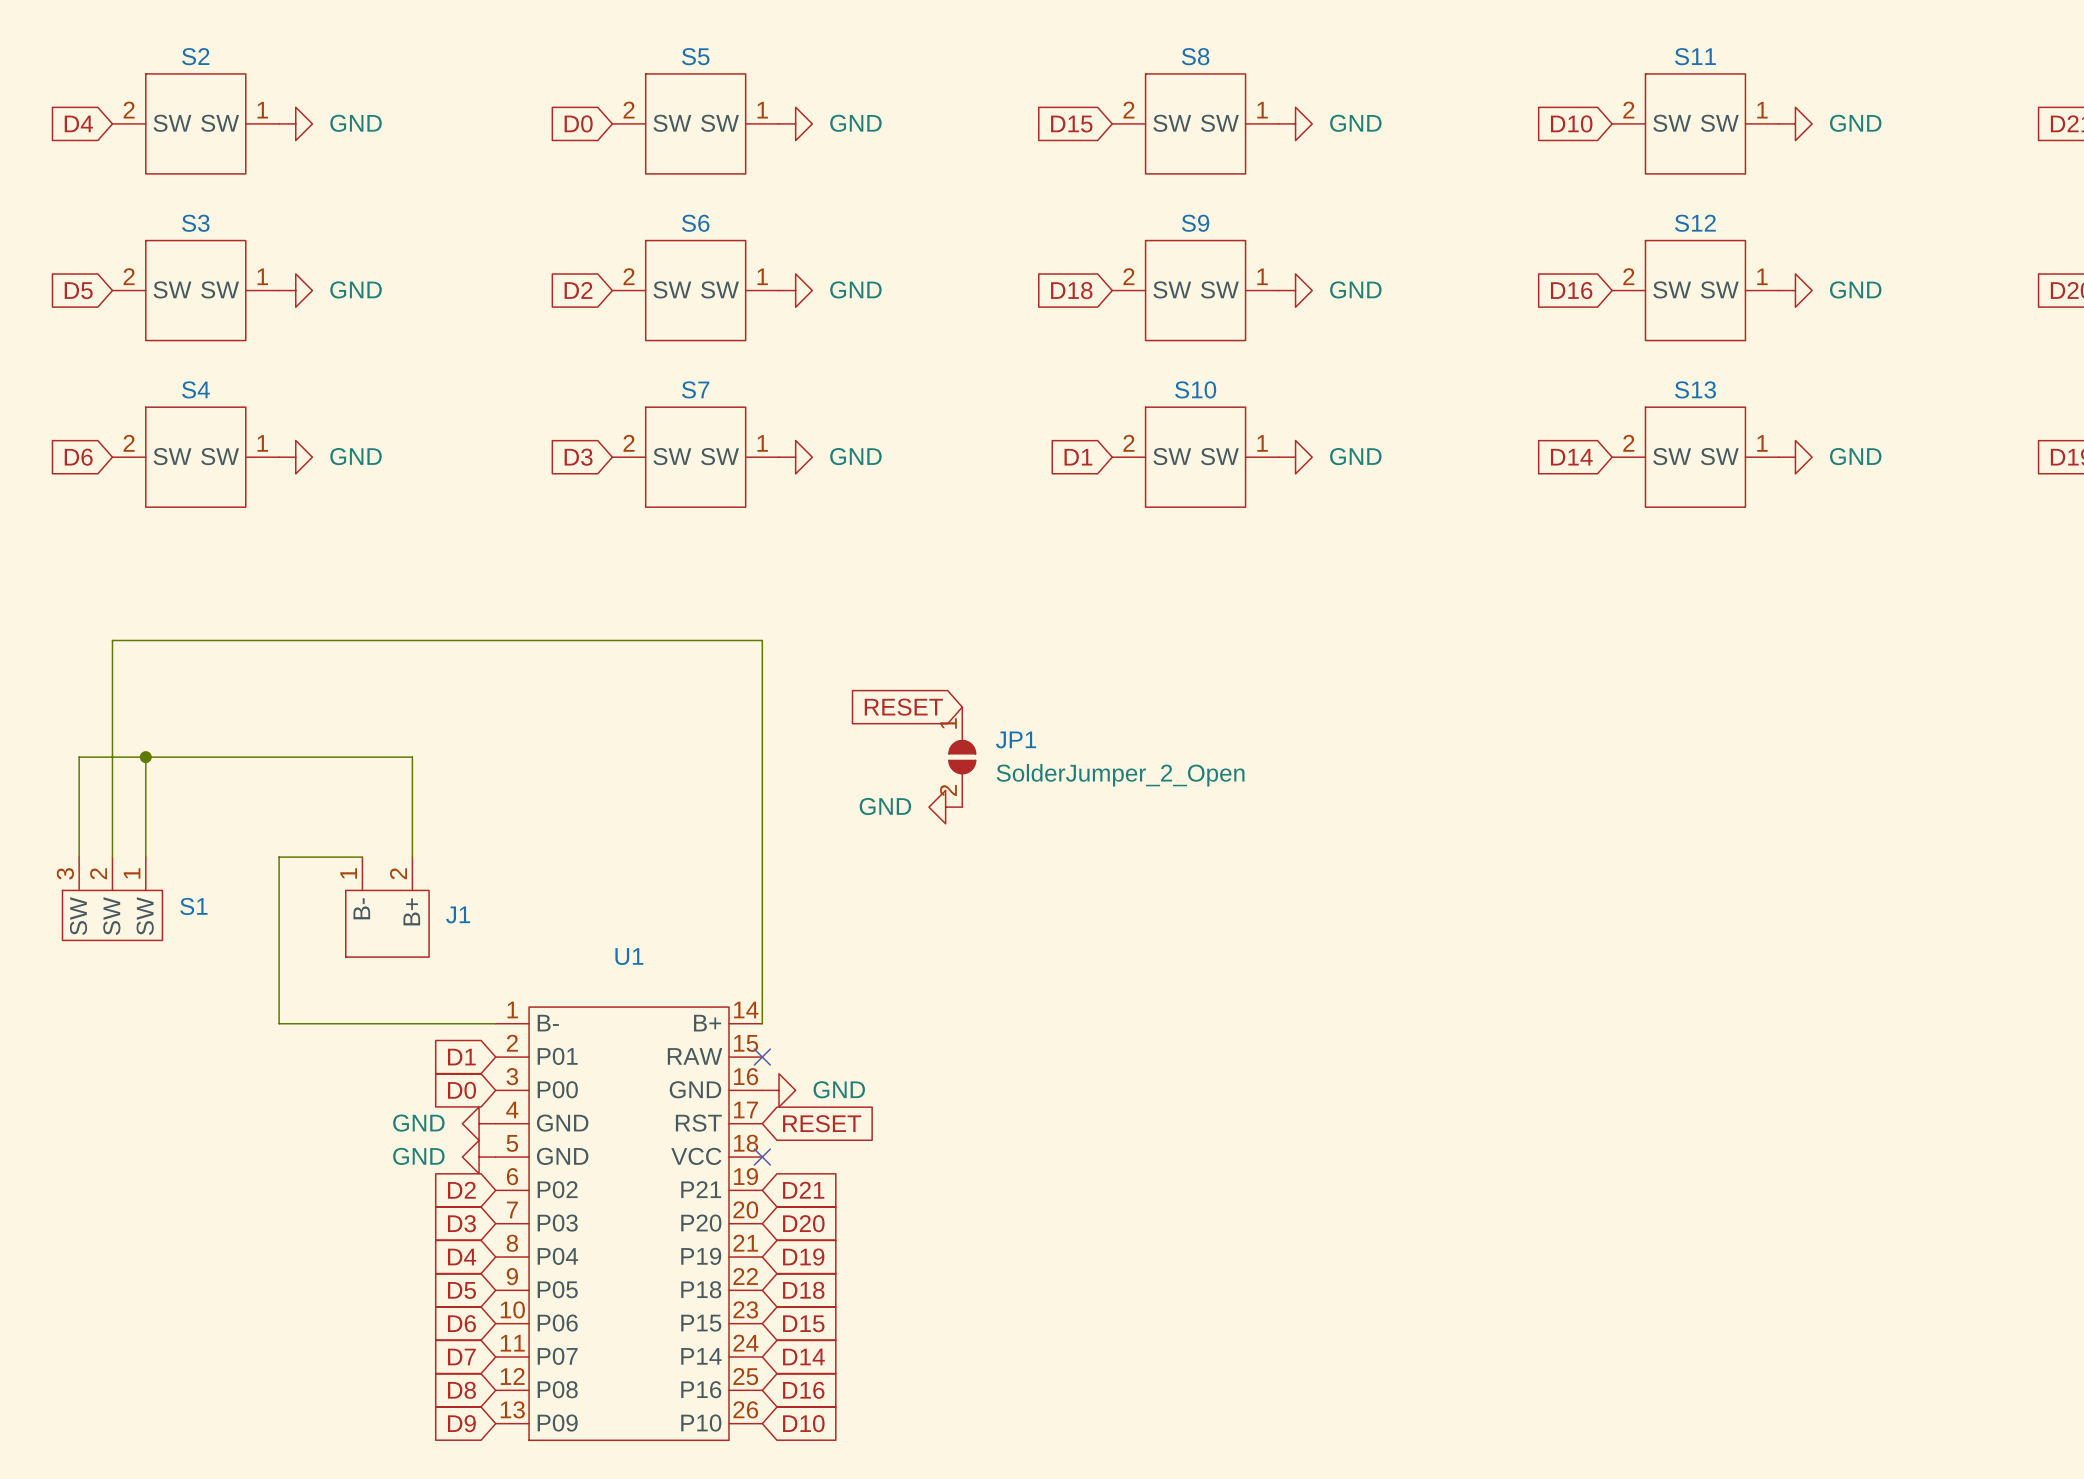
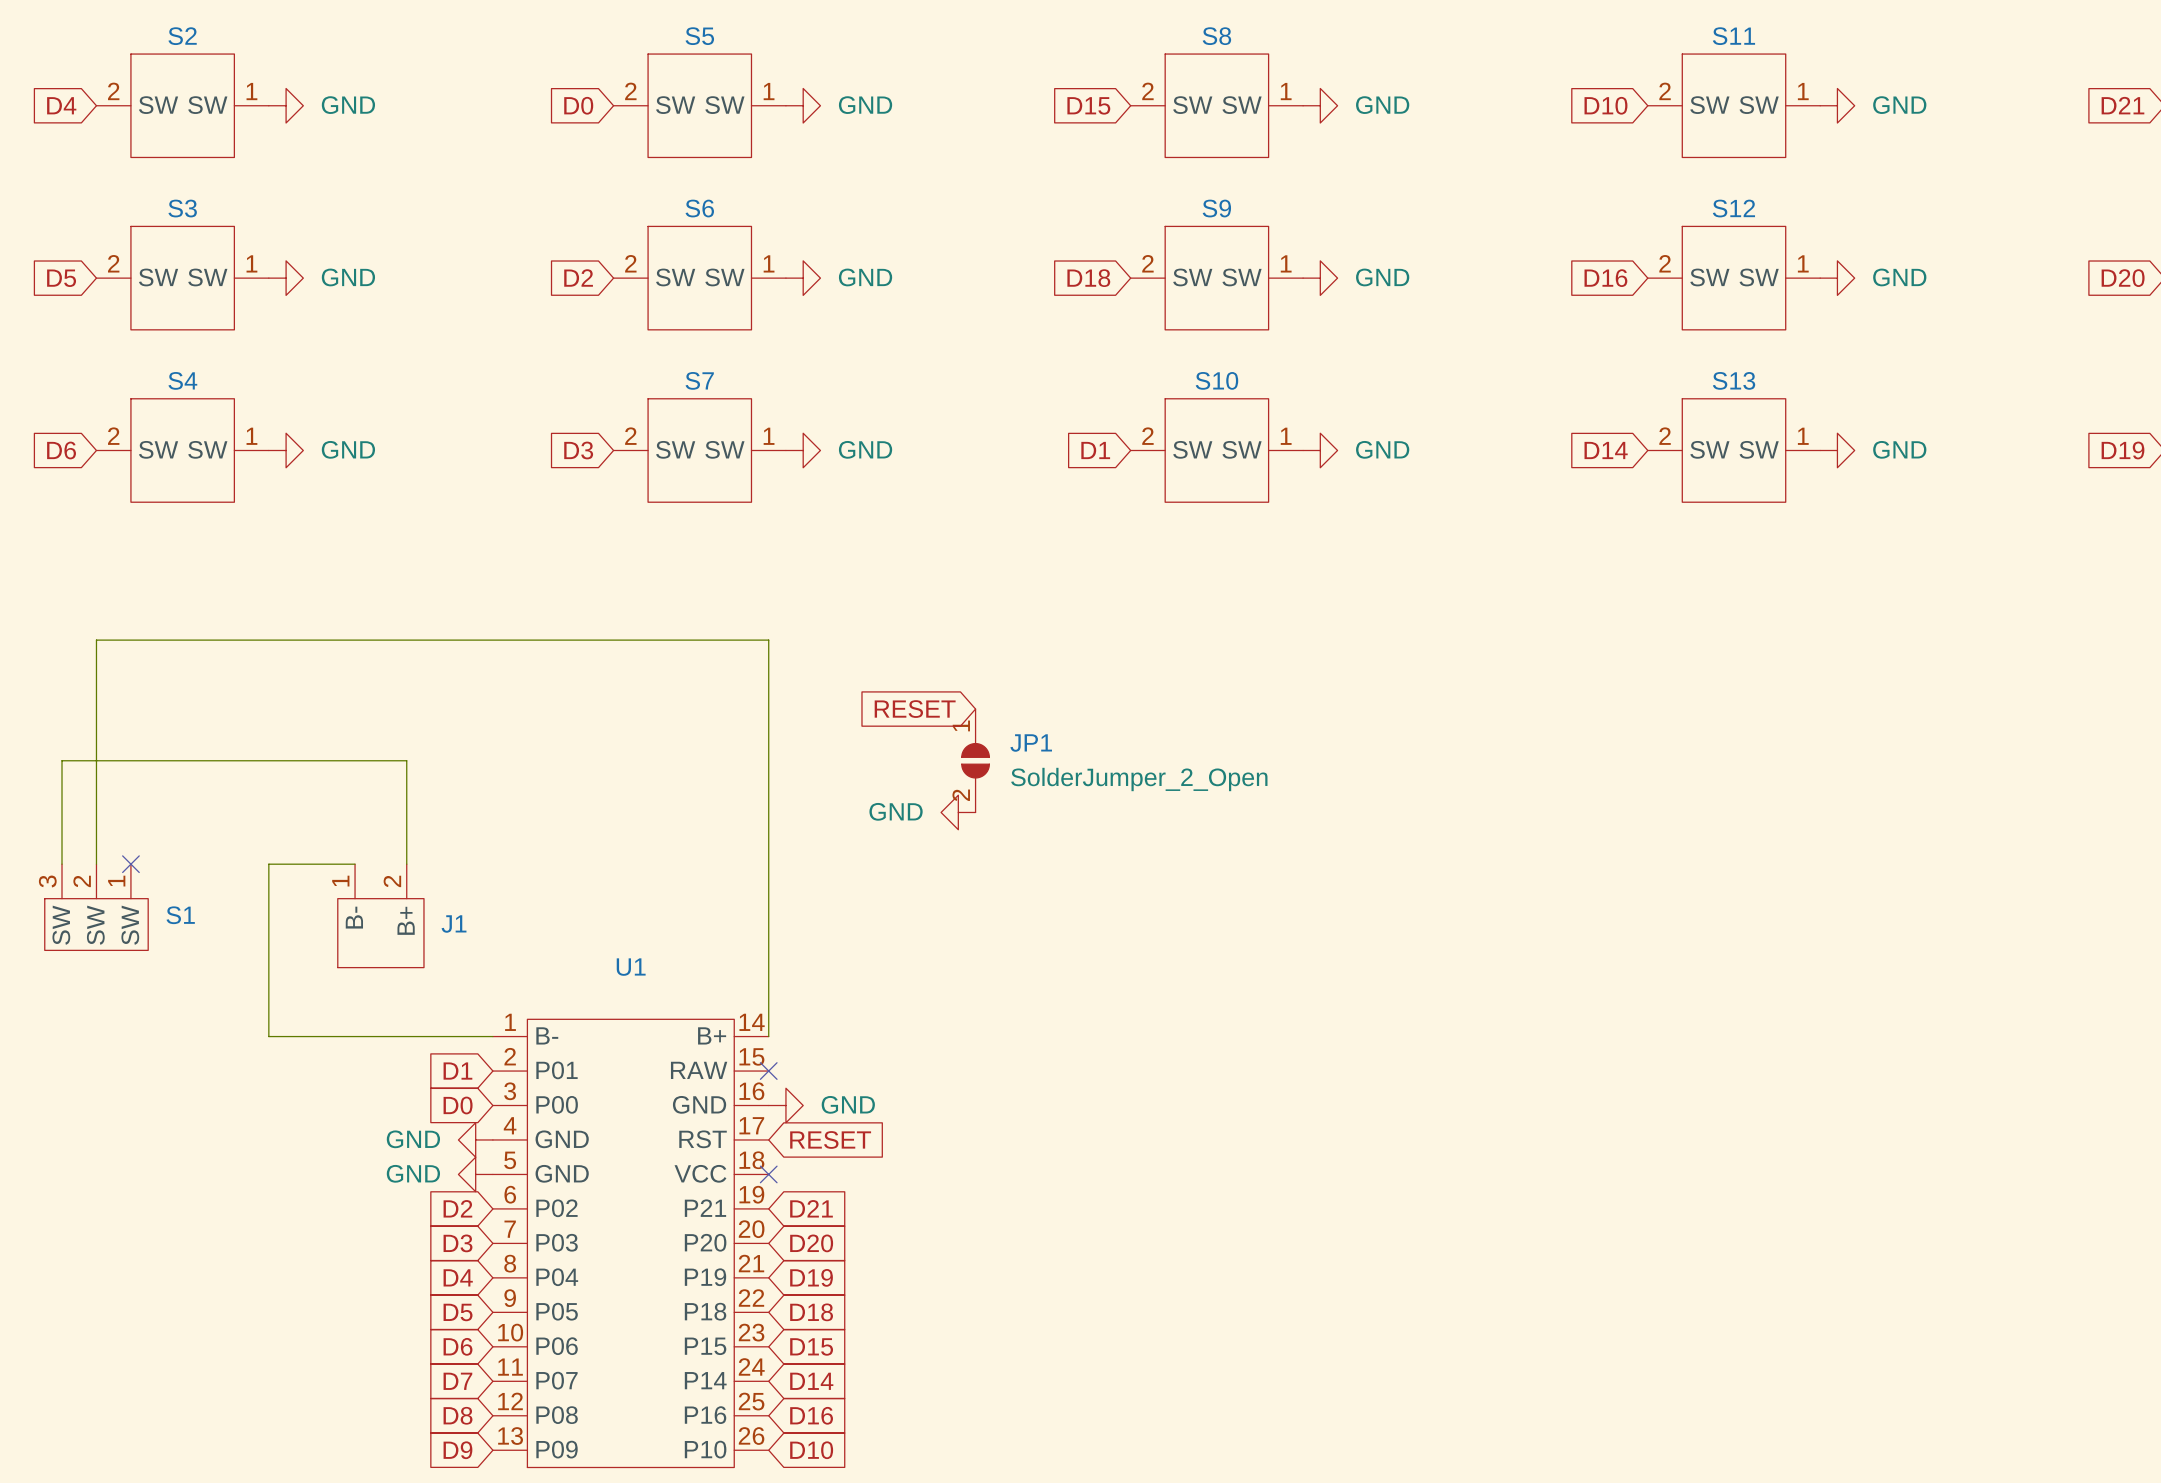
wire: (145, 757) (145, 857) -> none
junction: (145, 757) -> none
no-connect mark: none -> (130, 864)

